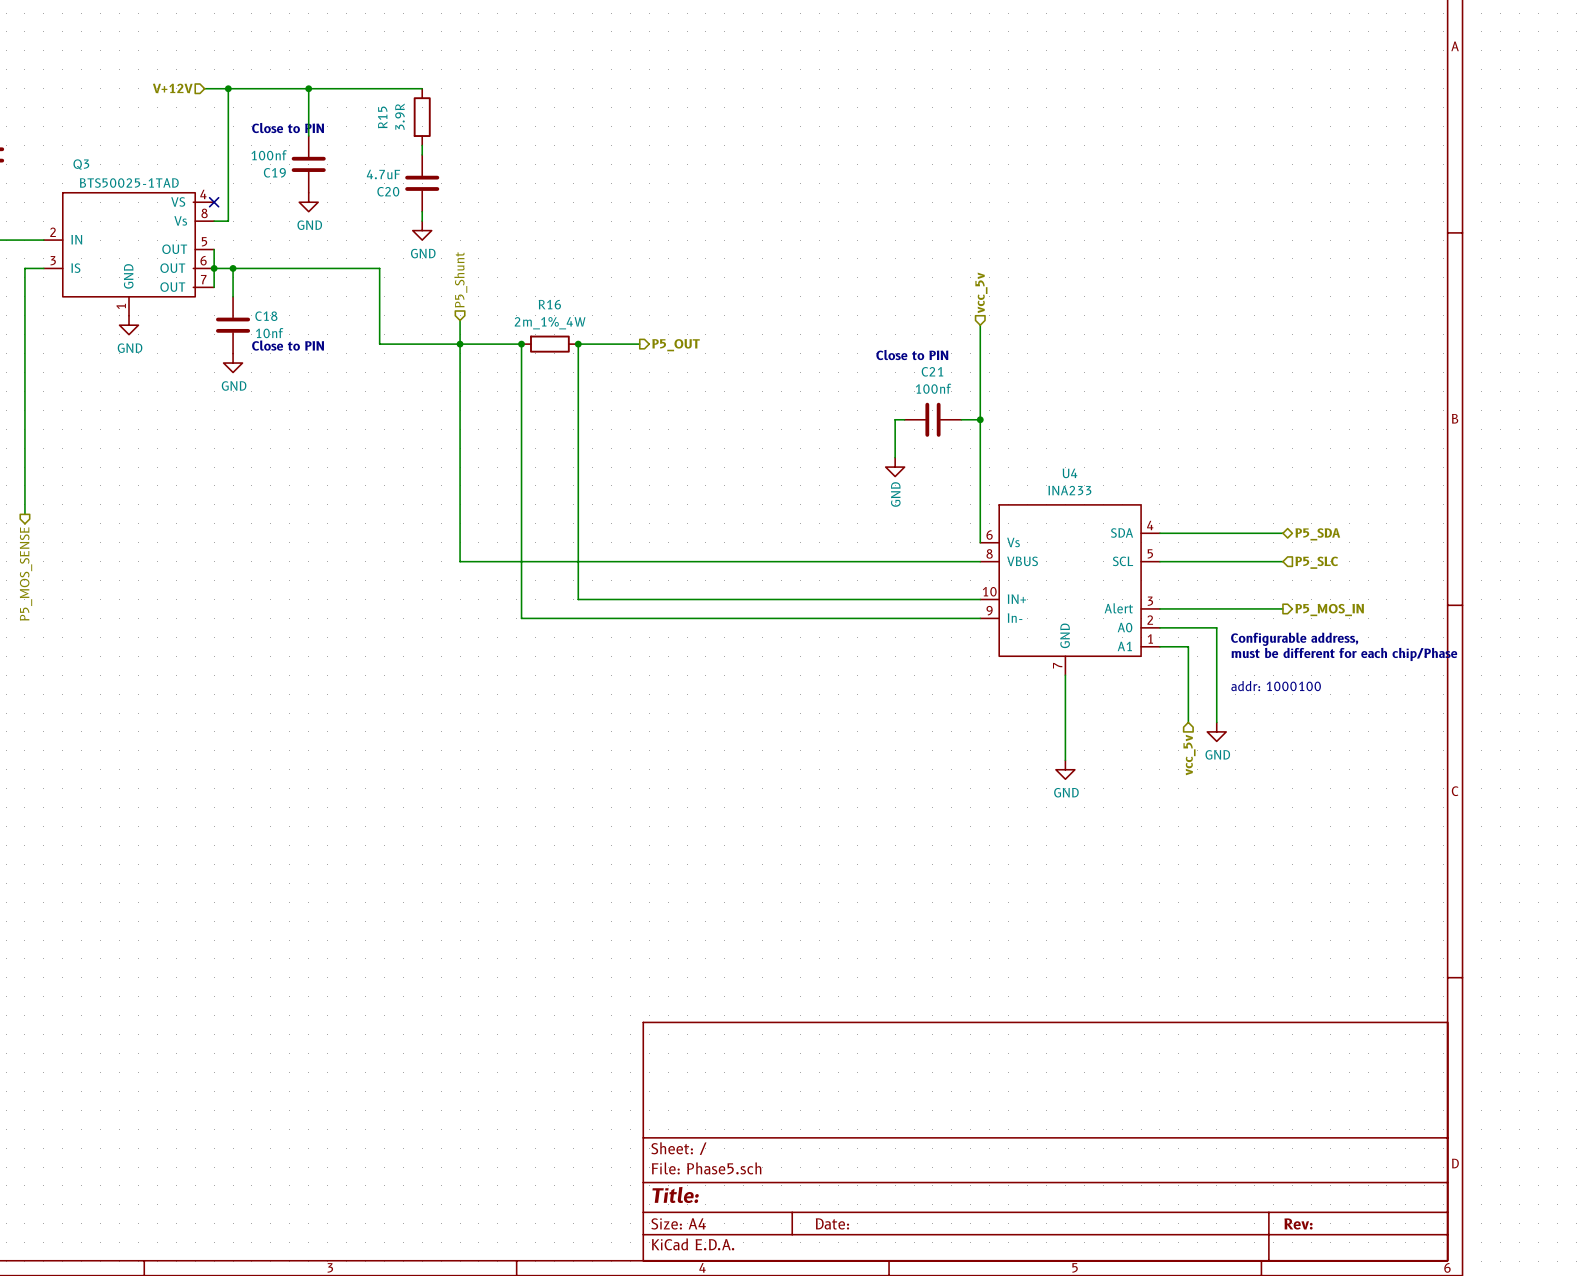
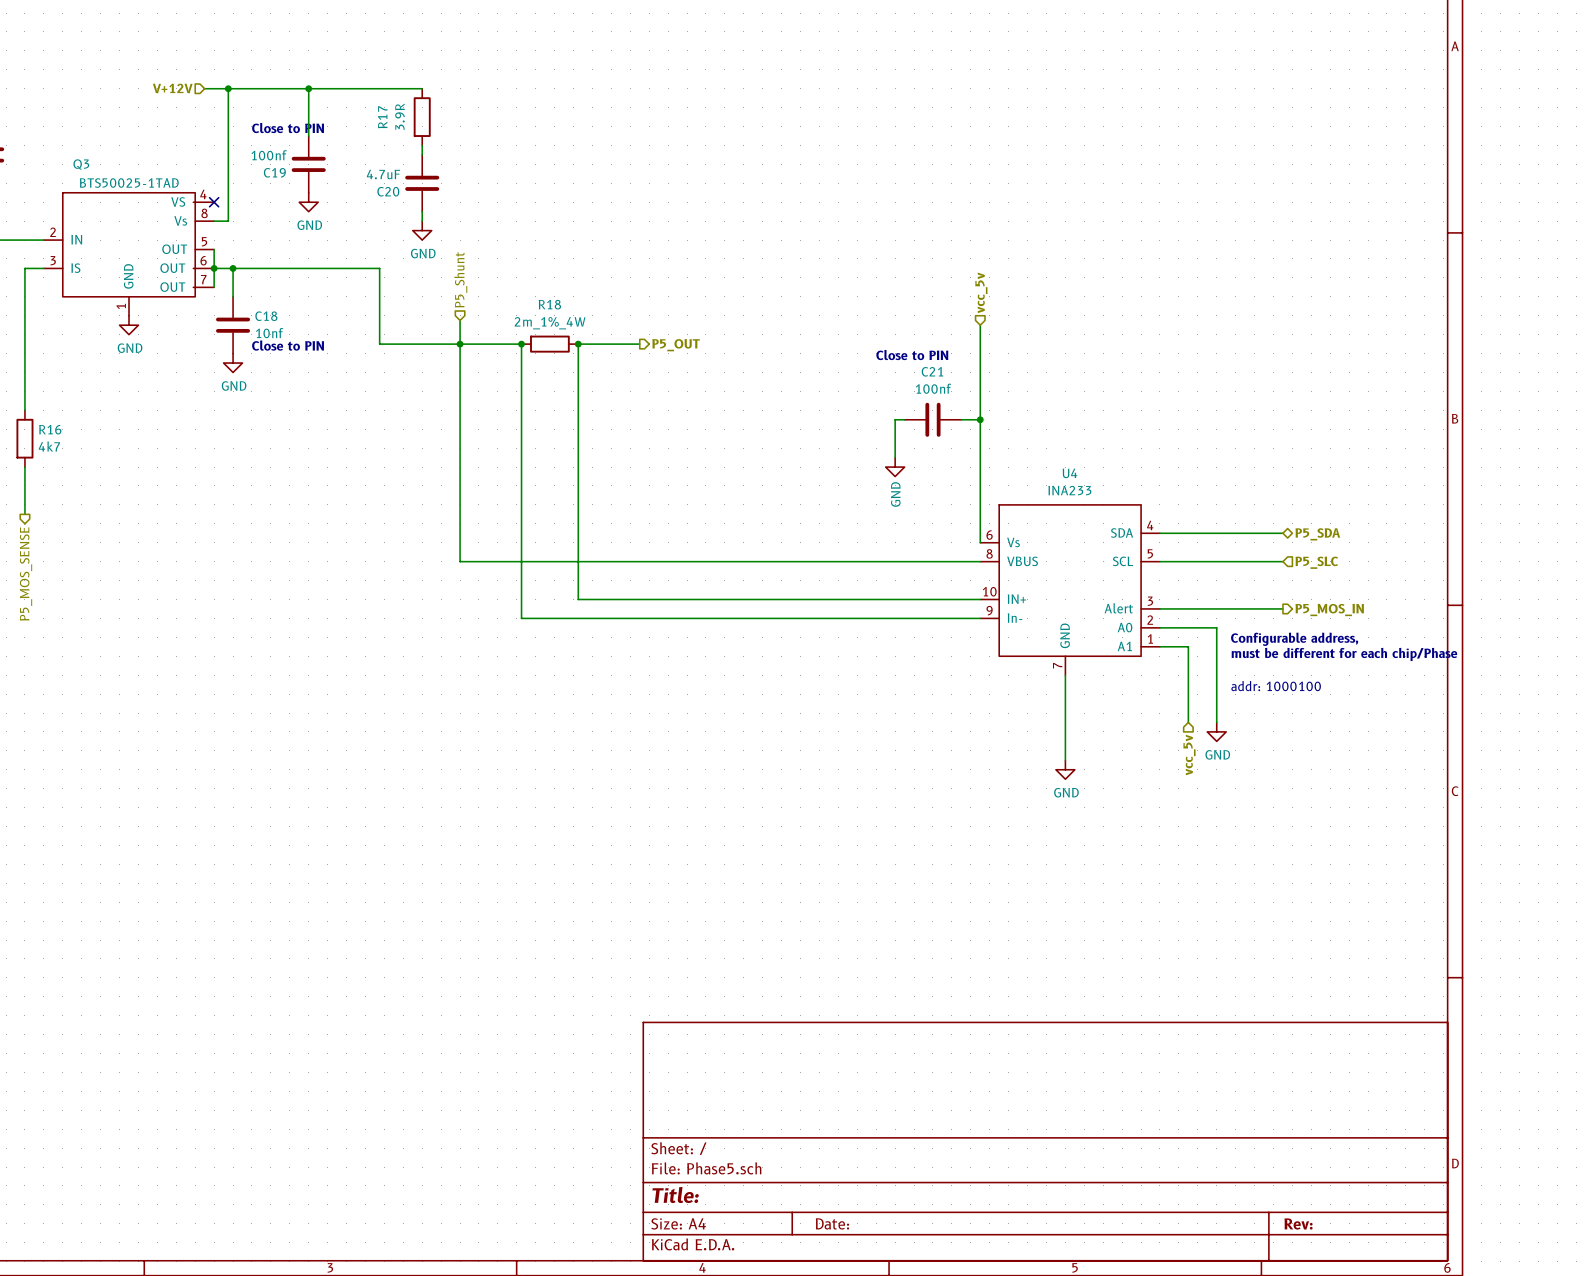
R15 name: R15 (382, 117) -> R17 (382, 117)
R16 name: R16 (549, 304) -> R18 (549, 304)
wire: (24, 410) (24, 467) -> none
R16: none -> 4k7 (24, 438)

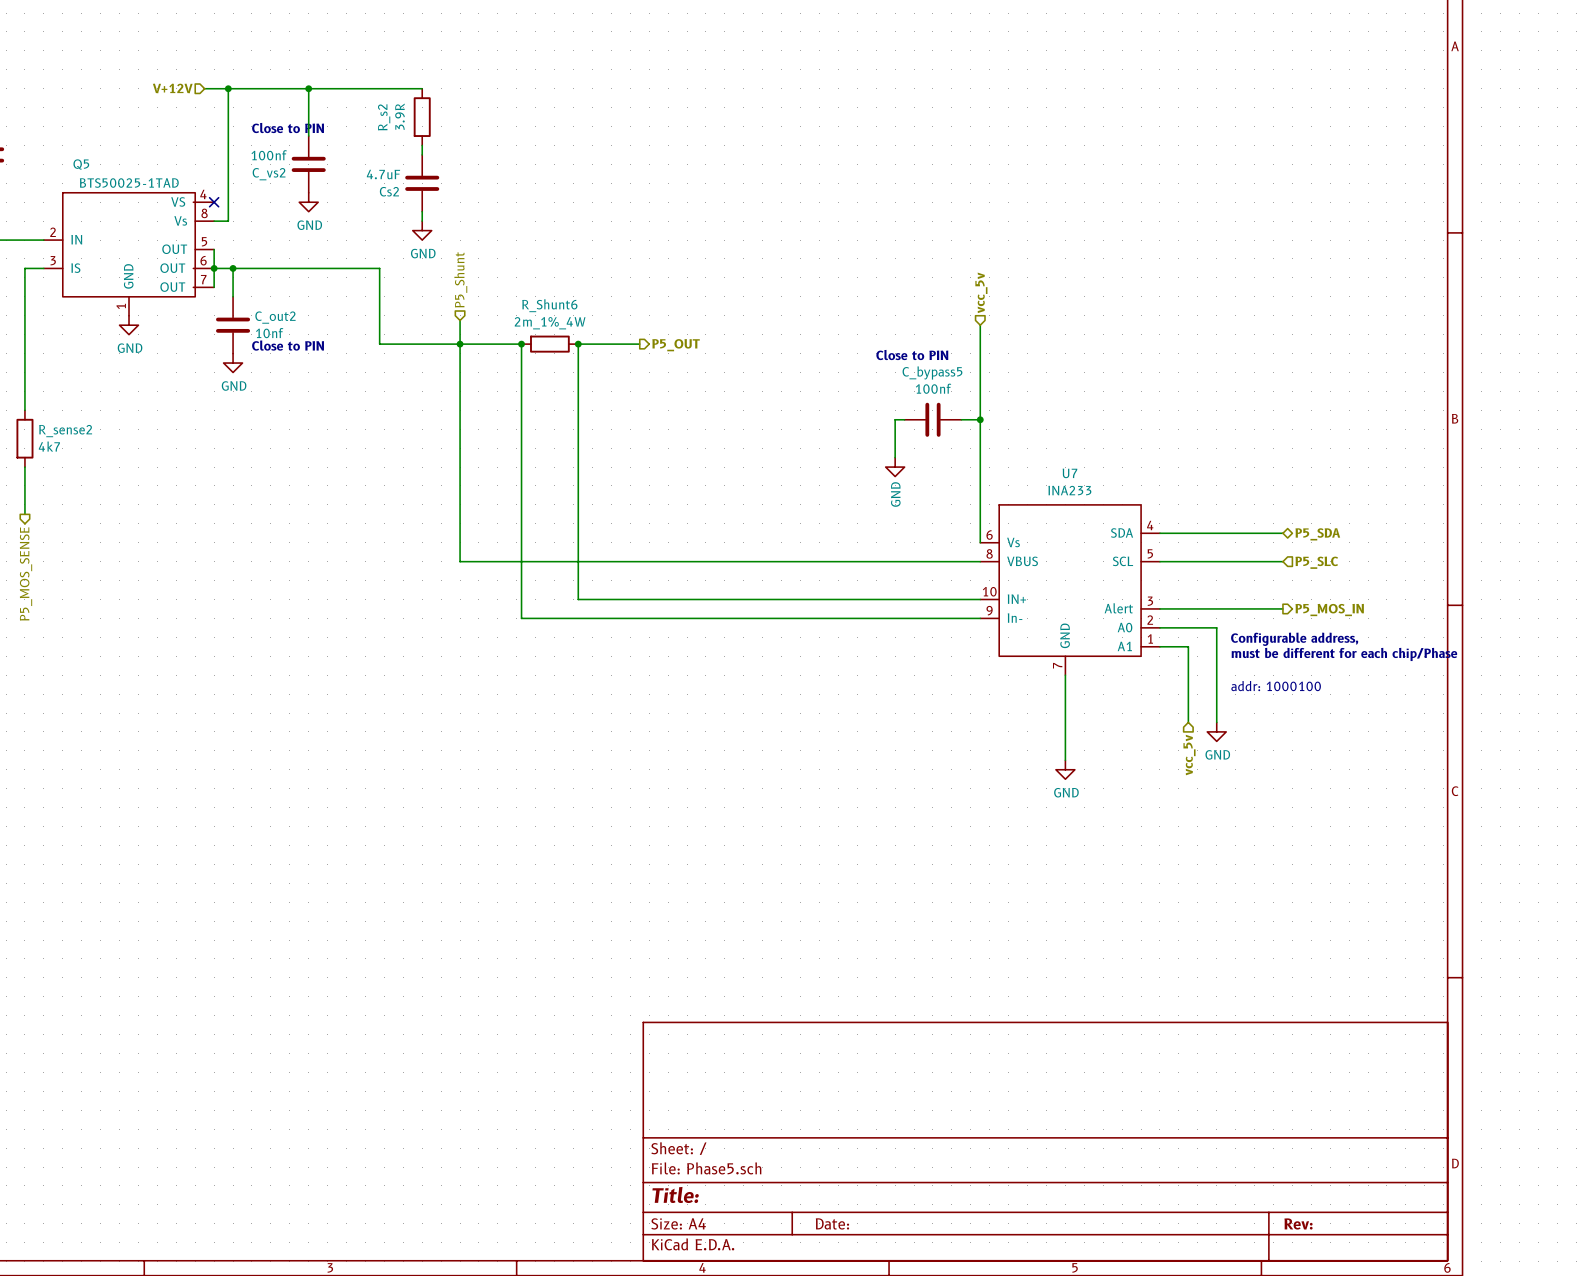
R17 name: R17 (382, 117) -> R_s2 (384, 117)
Q3 name: Q3 (81, 164) -> Q5 (81, 164)
C19 name: C19 (274, 172) -> C_vs2 (269, 174)
C20 name: C20 (388, 191) -> Cs2 (389, 191)
R18 name: R18 (549, 304) -> R_Shunt6 (549, 305)
C18 name: C18 (266, 316) -> C_out2 (275, 317)
C21 name: C21 (932, 371) -> C_bypass5 (932, 373)
R16 name: R16 (50, 429) -> R_sense2 (65, 431)
U4 name: U4 (1069, 473) -> U7 (1069, 473)

